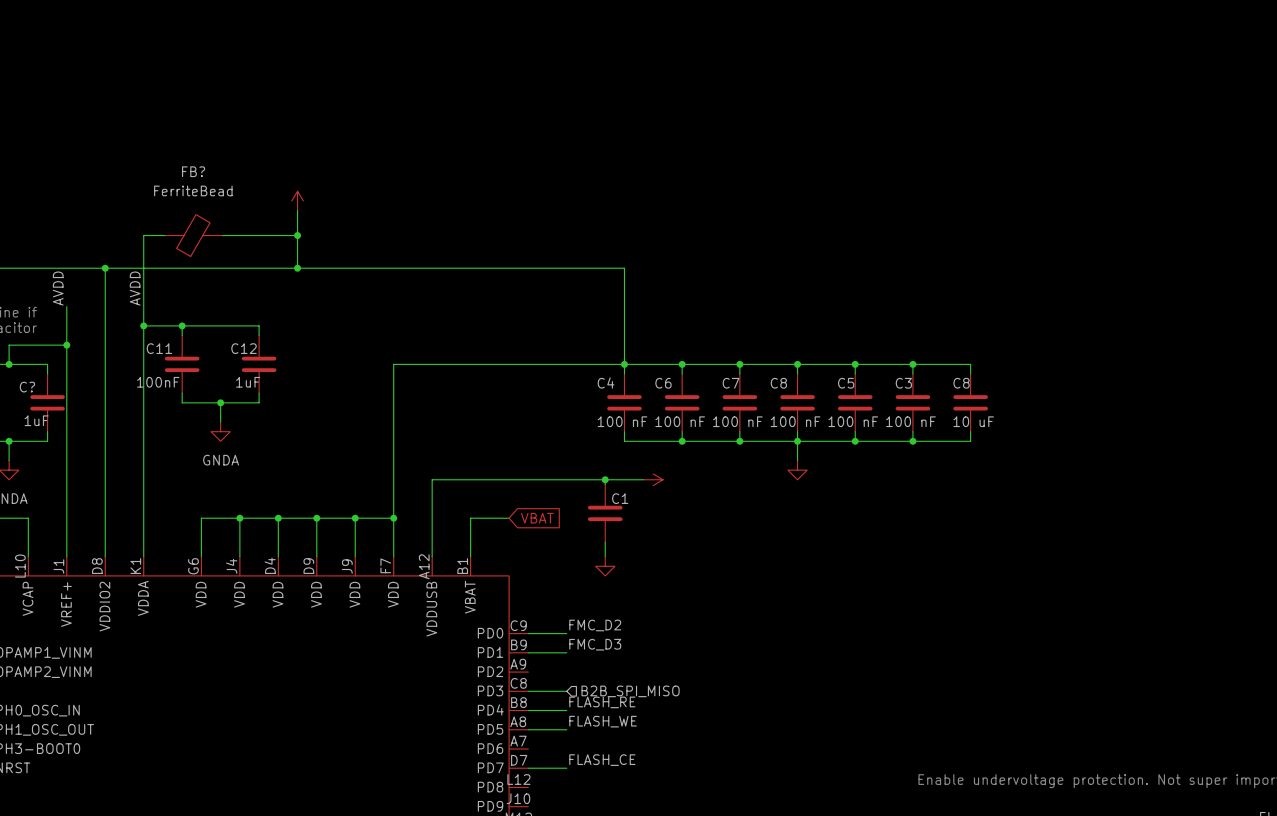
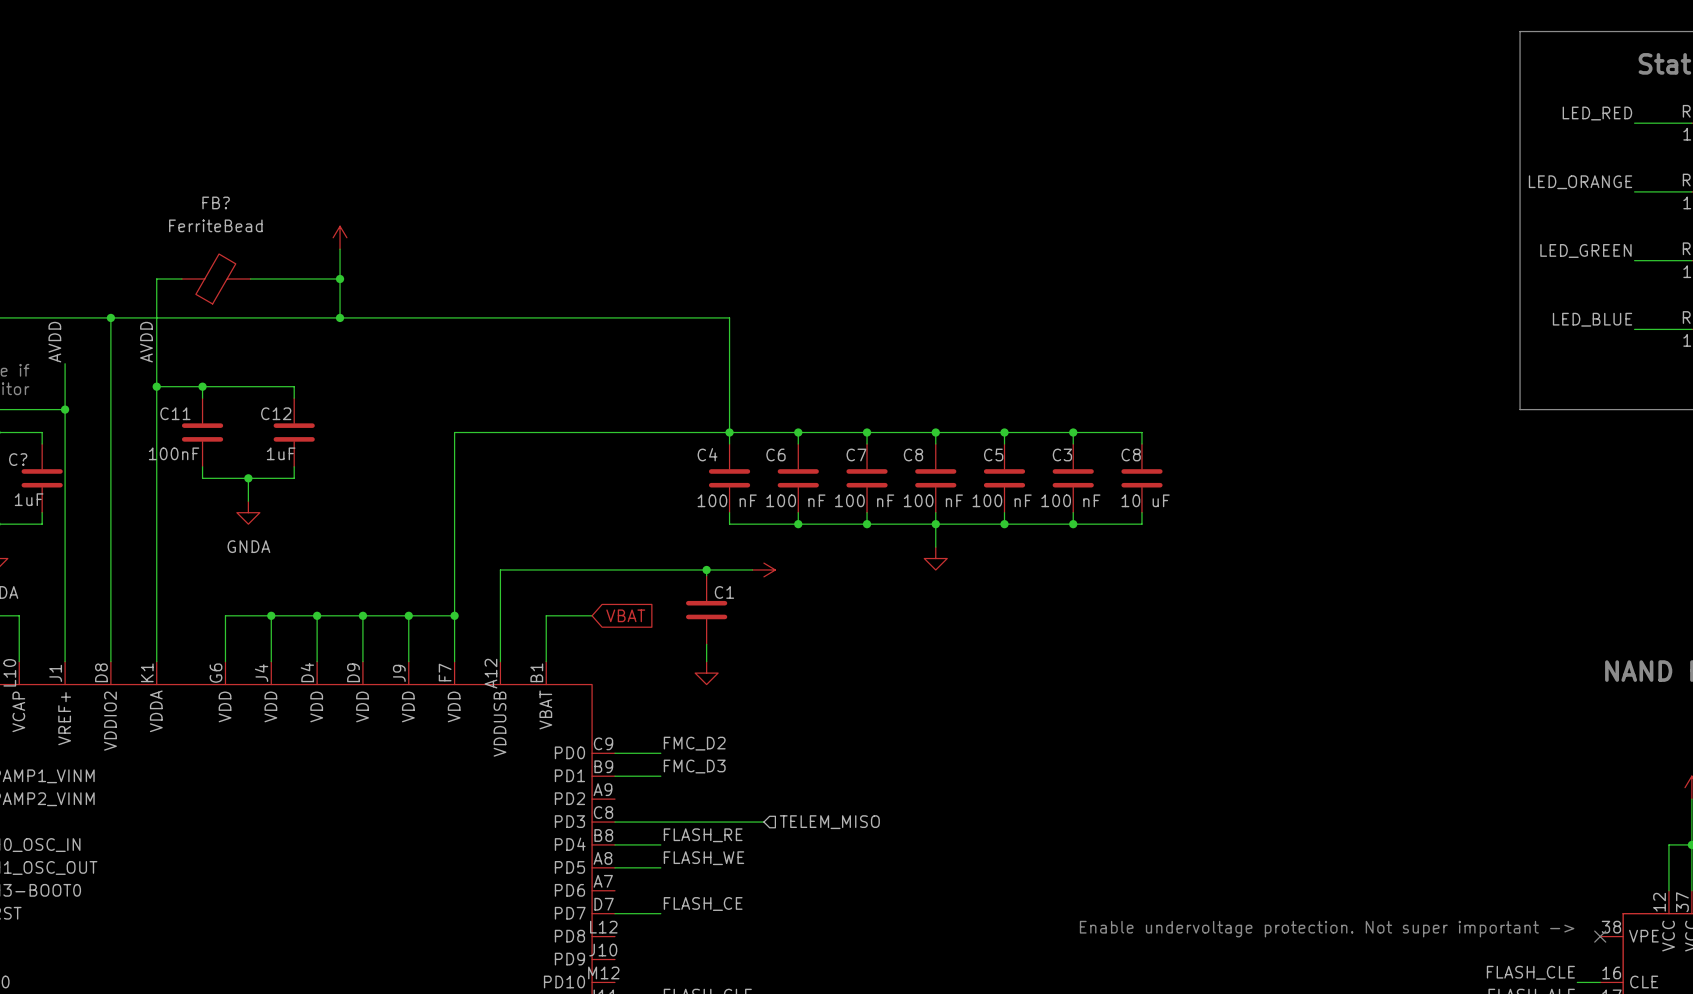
wire: none -> (660, 822) (763, 822)
hierarchical label: B2B_SPI_MISO (630, 691) -> none
hierarchical label: none -> TELEM_MISO (829, 822)

